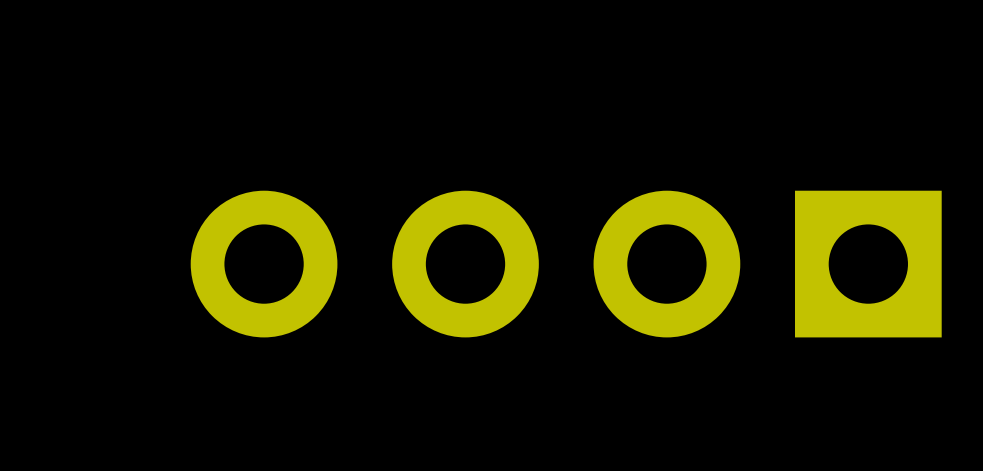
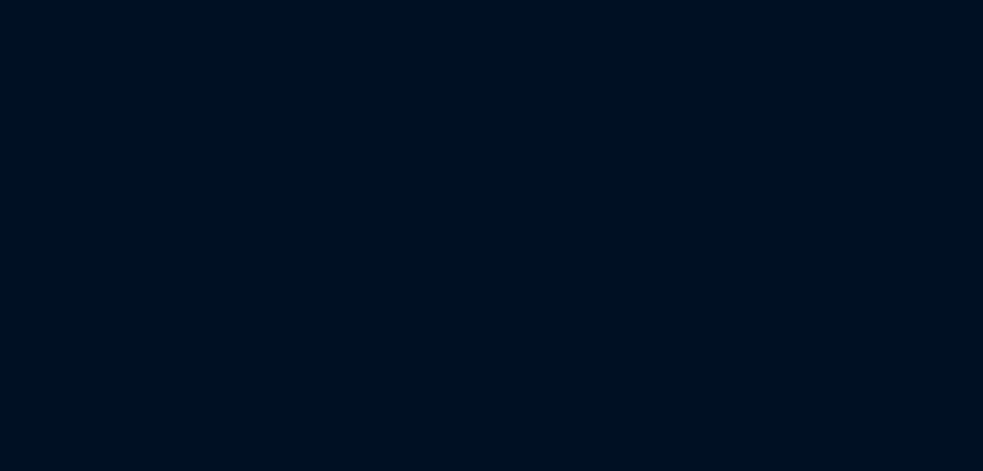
part: (566, 264) -> none

